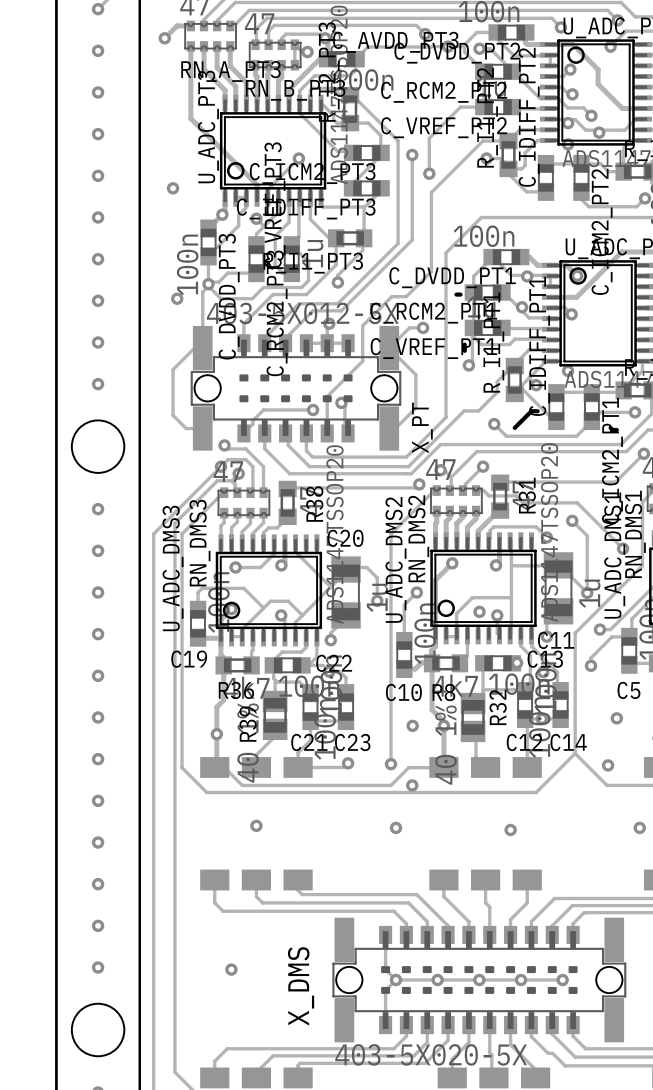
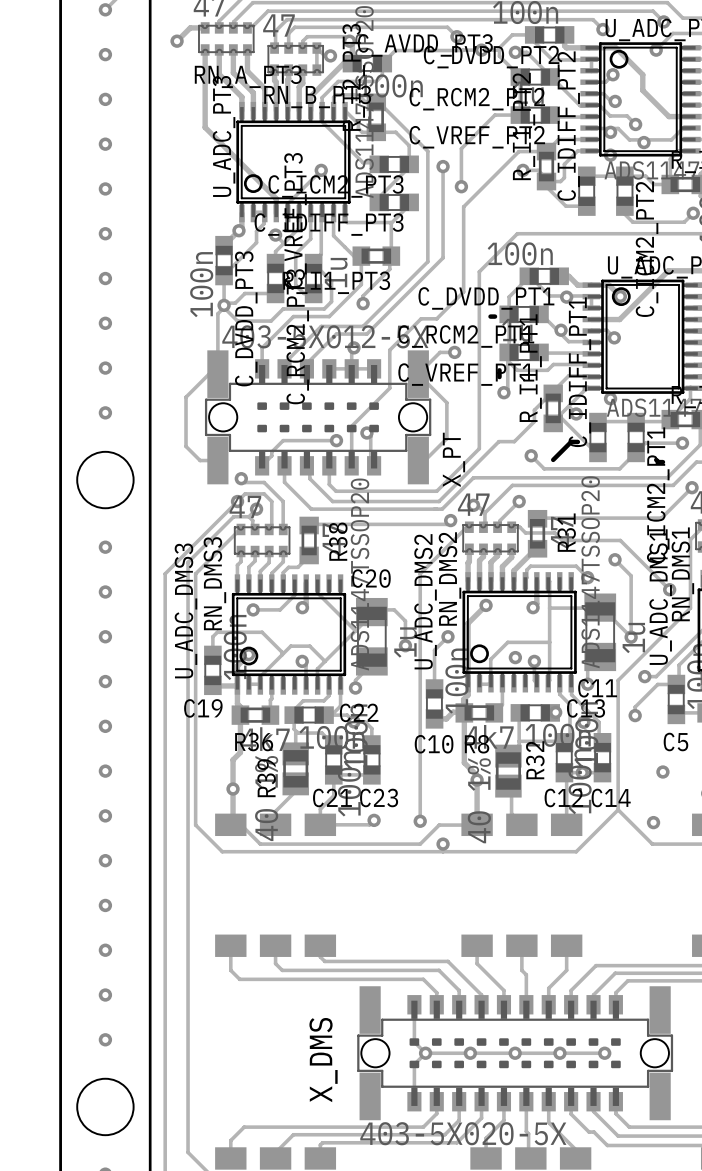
via: (173, 188) -> none
via: (177, 298) -> none
via: (412, 725) -> none
via: (256, 825) -> none
via: (396, 827) -> none
via: (639, 827) -> none
via: (510, 830) -> none
via: (231, 969) -> none

